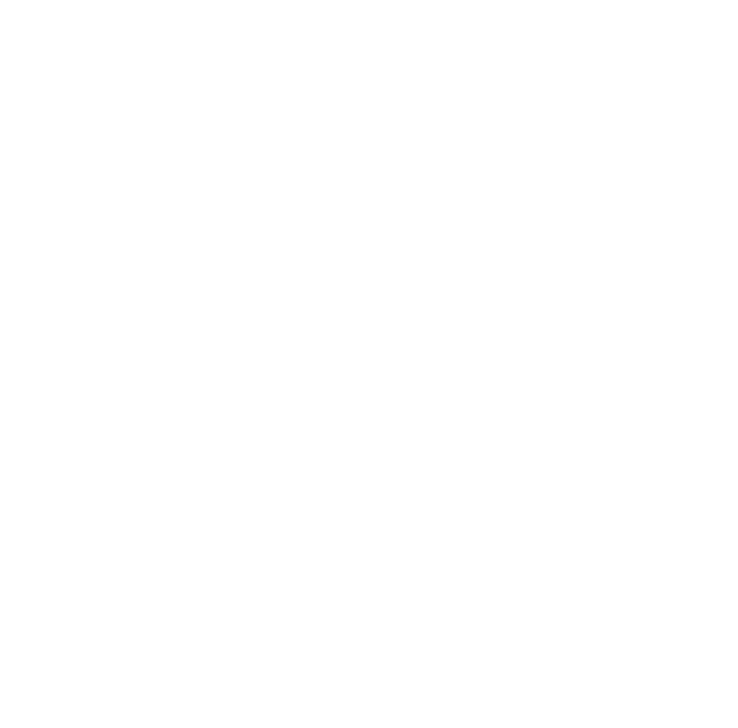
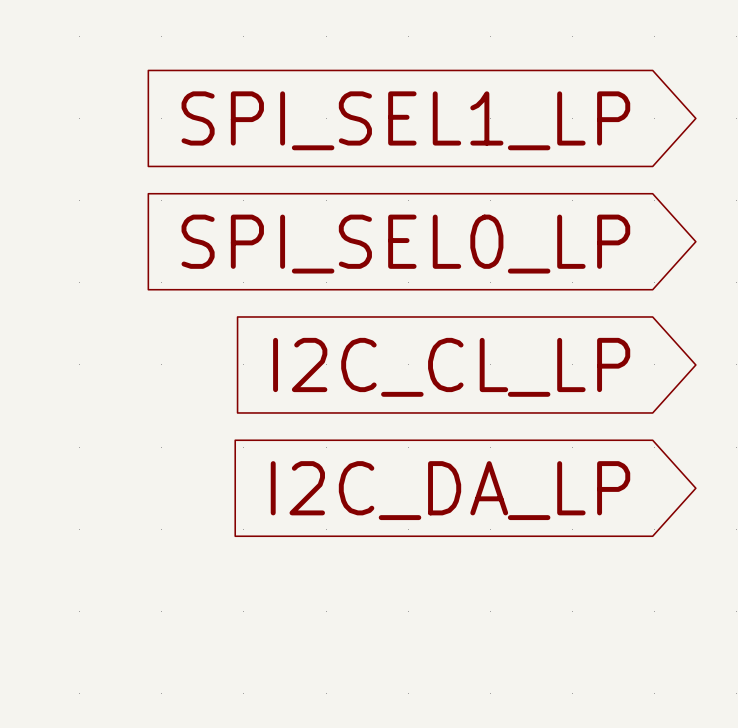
global label: none -> SPI_SEL1_LP (405, 120)
global label: none -> SPI_SEL0_LP (405, 244)
global label: none -> I2C_CL_LP (451, 367)
global label: none -> I2C_DA_LP (450, 490)

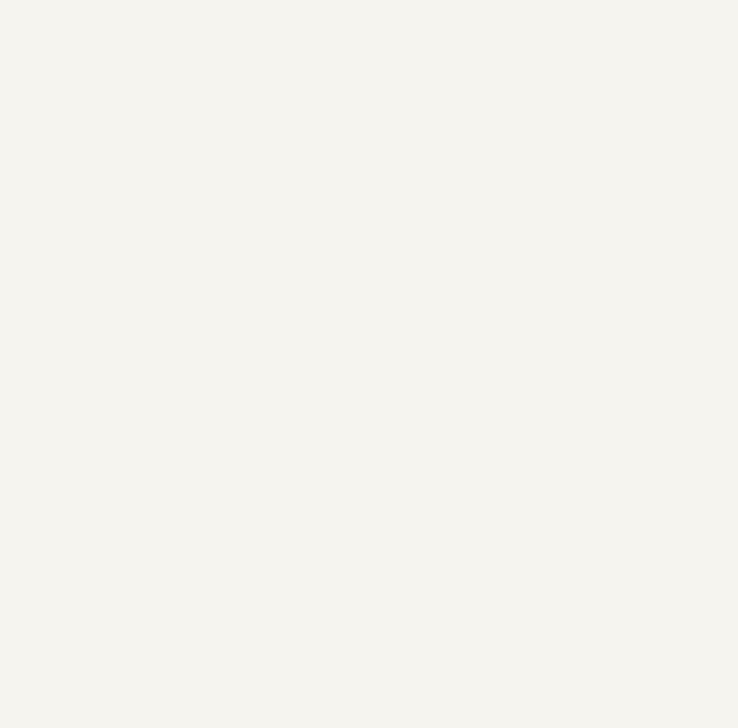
global label: SPI_SEL1_LP (405, 120) -> none
global label: SPI_SEL0_LP (405, 244) -> none
global label: I2C_CL_LP (451, 367) -> none
global label: I2C_DA_LP (450, 490) -> none

